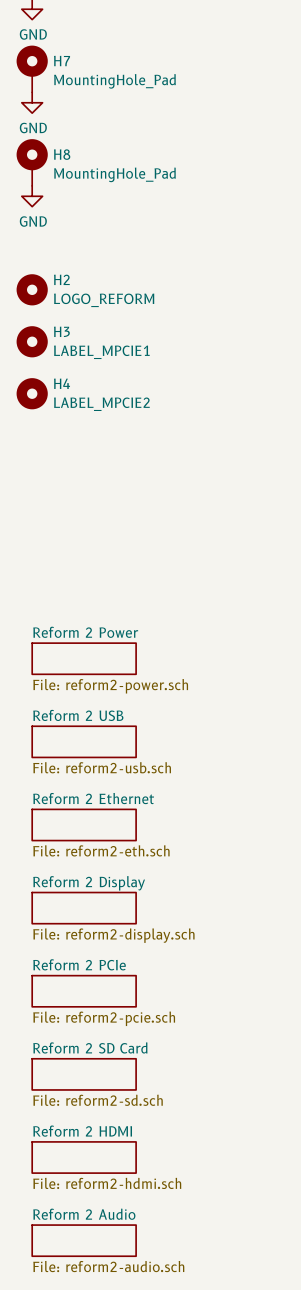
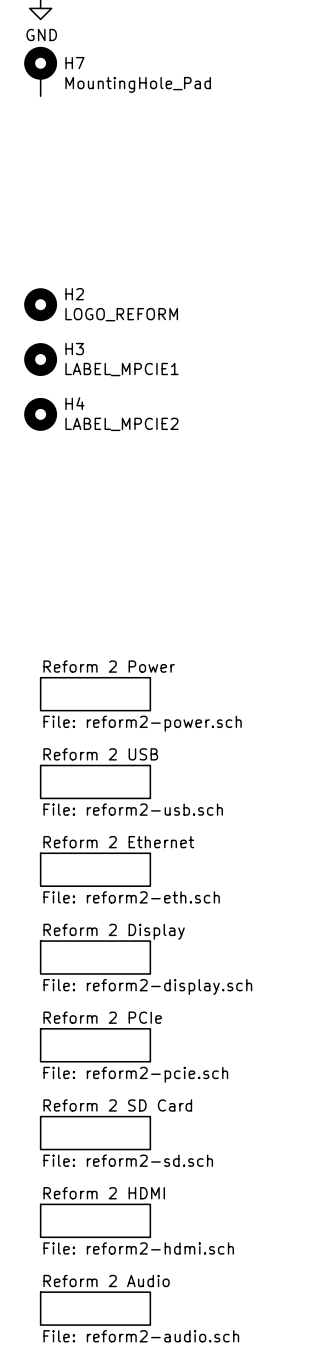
power symbol: GND (32, 102) -> none
H8: MountingHole_Pad (32, 162) -> none
power symbol: GND (32, 196) -> none

